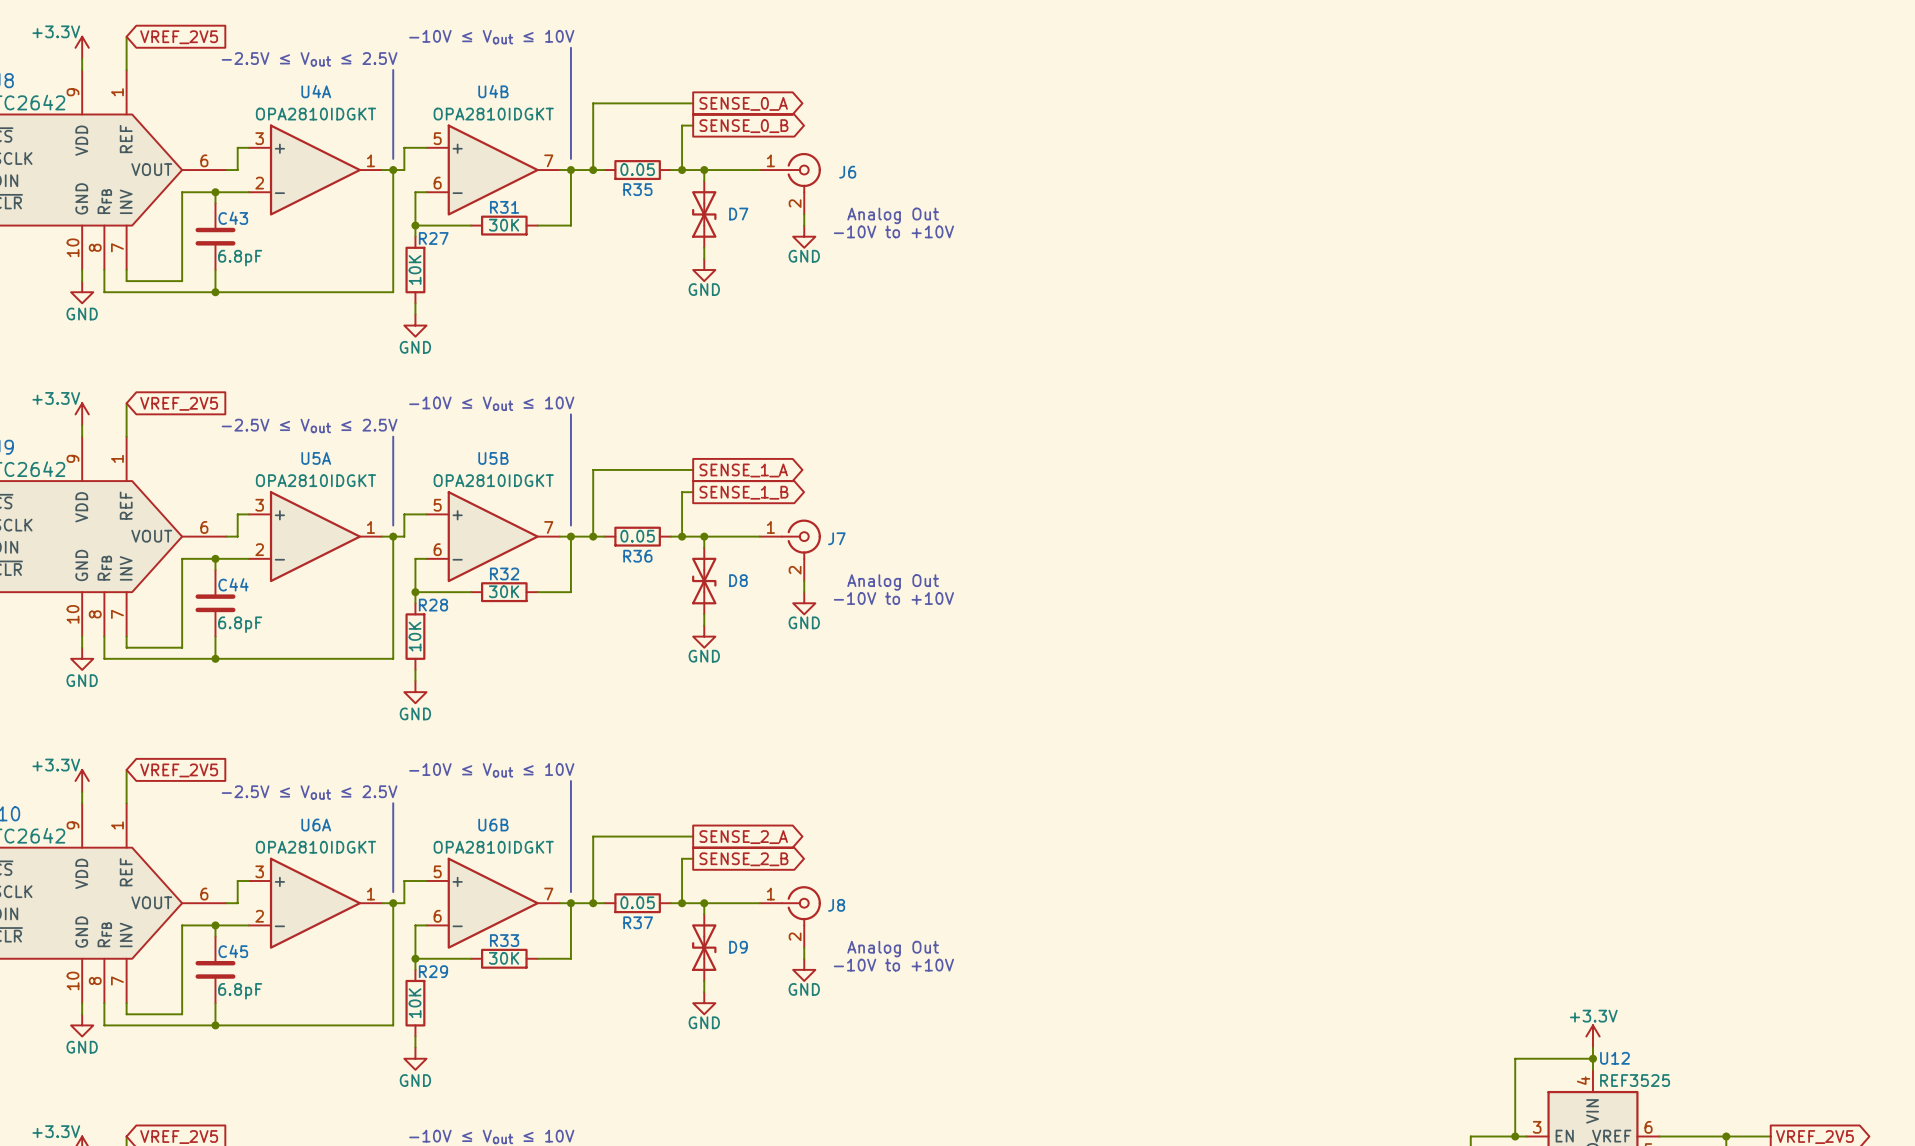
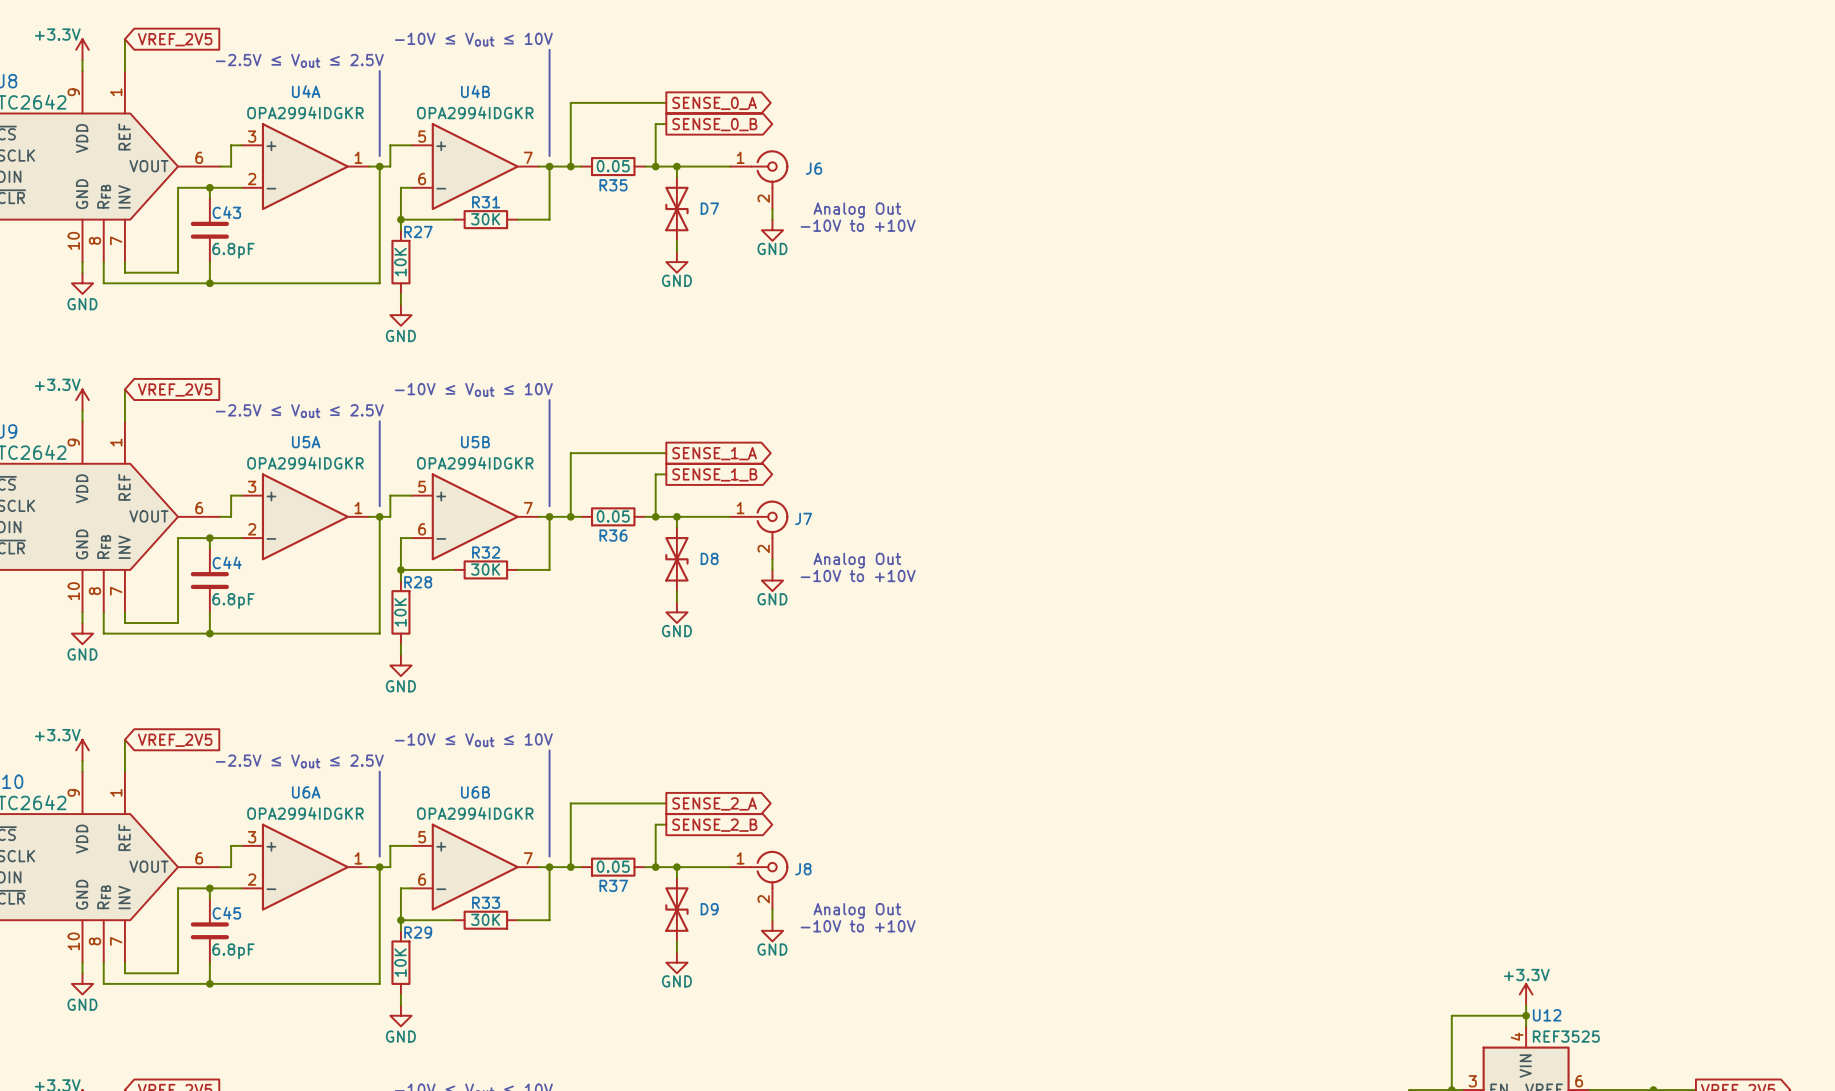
U4A value: OPA2810IDGKT (315, 114) -> OPA2994IDGKR (305, 112)
U4B value: OPA2810IDGKT (493, 114) -> OPA2994IDGKR (475, 112)
U5A value: OPA2810IDGKT (315, 480) -> OPA2994IDGKR (305, 463)
U5B value: OPA2810IDGKT (493, 480) -> OPA2994IDGKR (475, 463)
U6A value: OPA2810IDGKT (315, 847) -> OPA2994IDGKR (305, 813)
U6B value: OPA2810IDGKT (493, 847) -> OPA2994IDGKR (475, 813)

